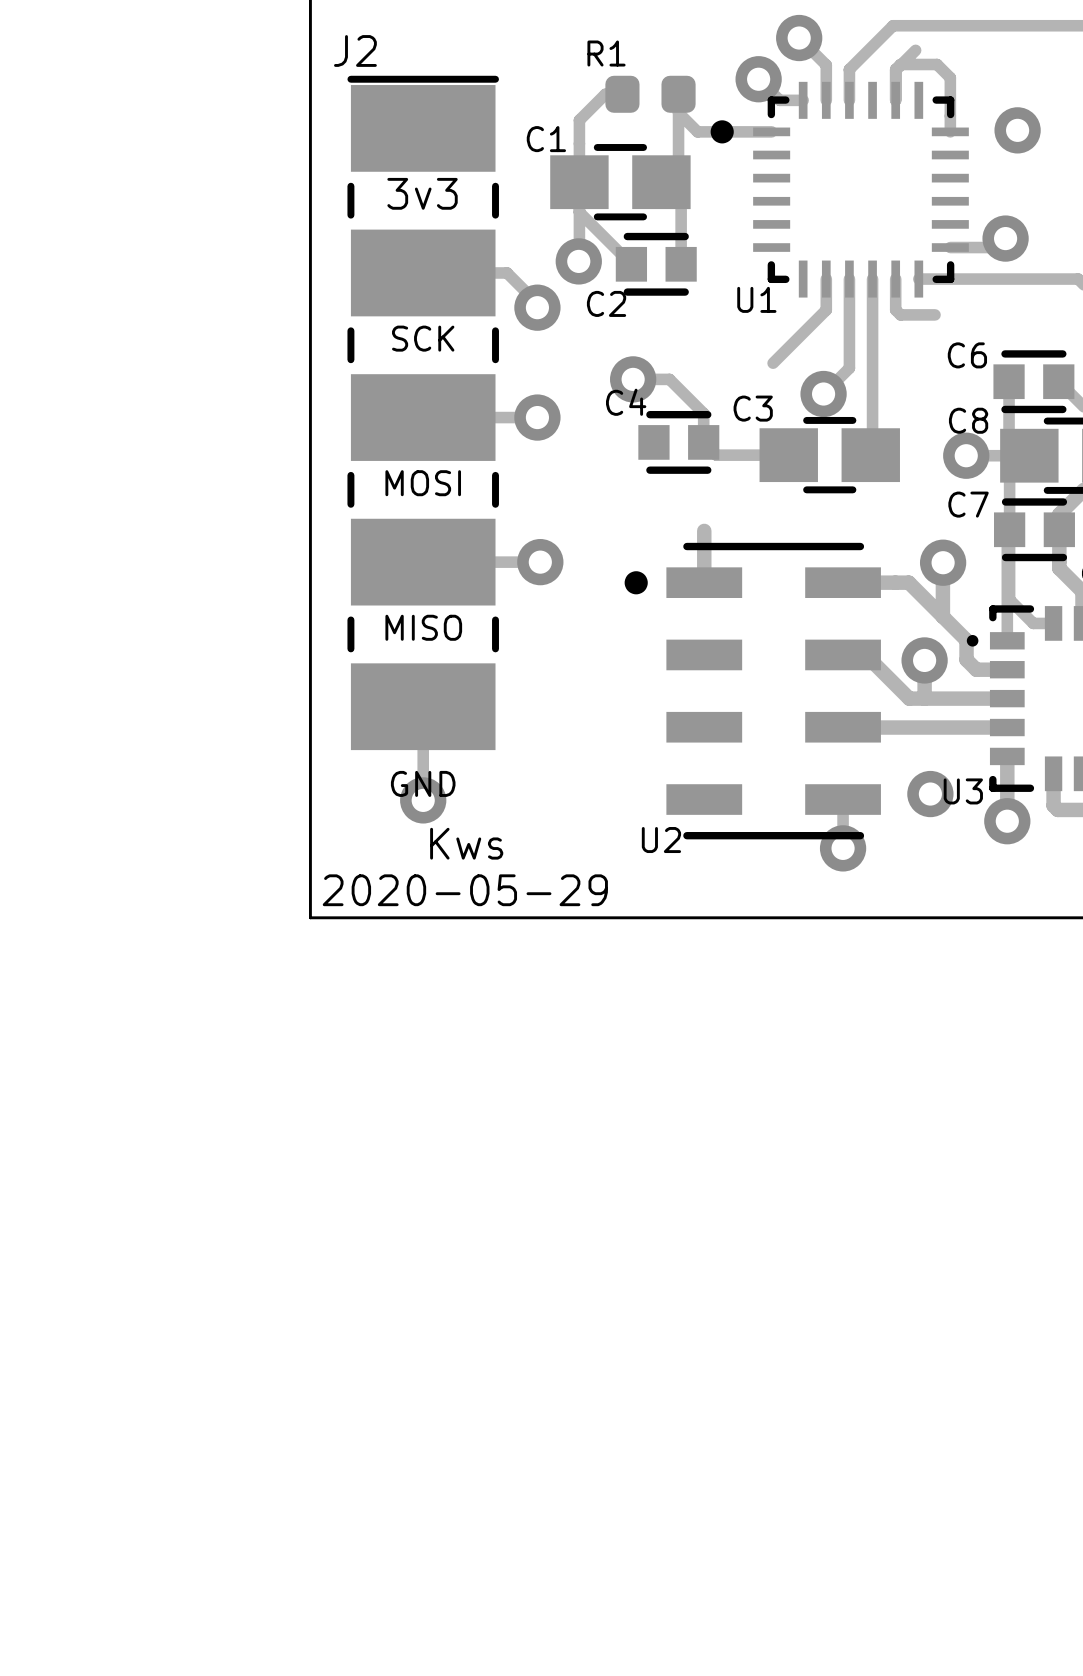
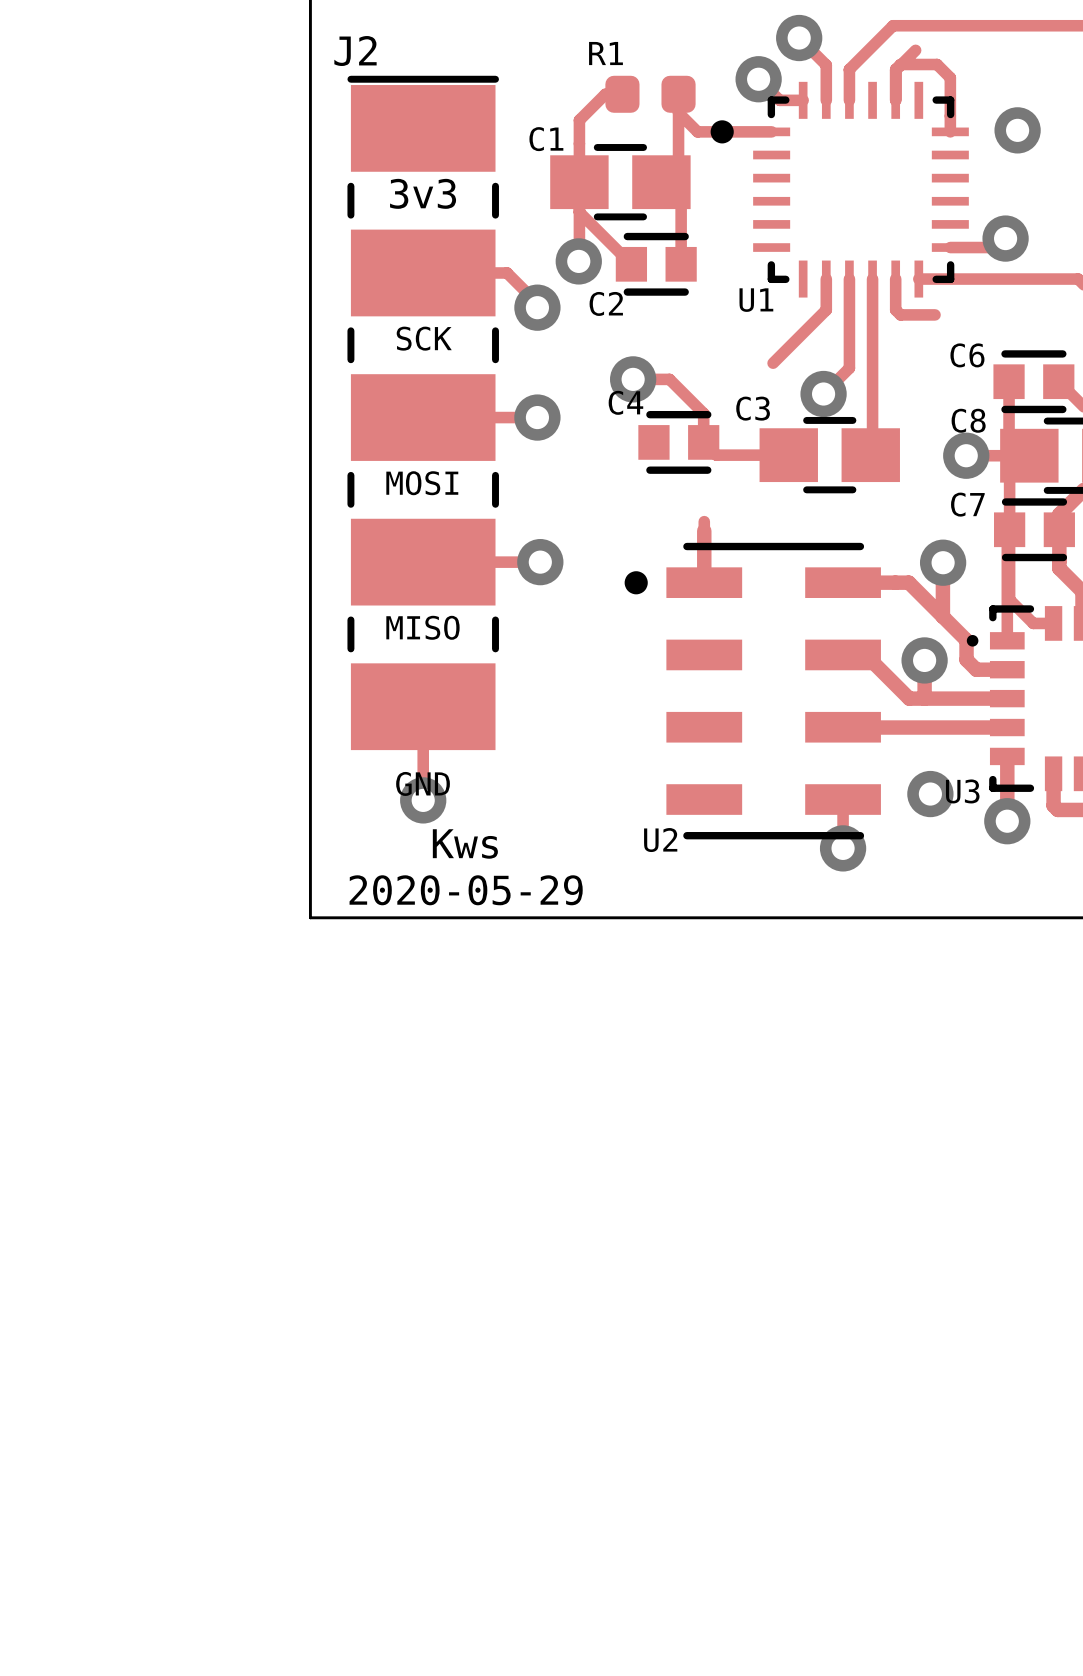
track: none -> (704, 521) (704, 530)

